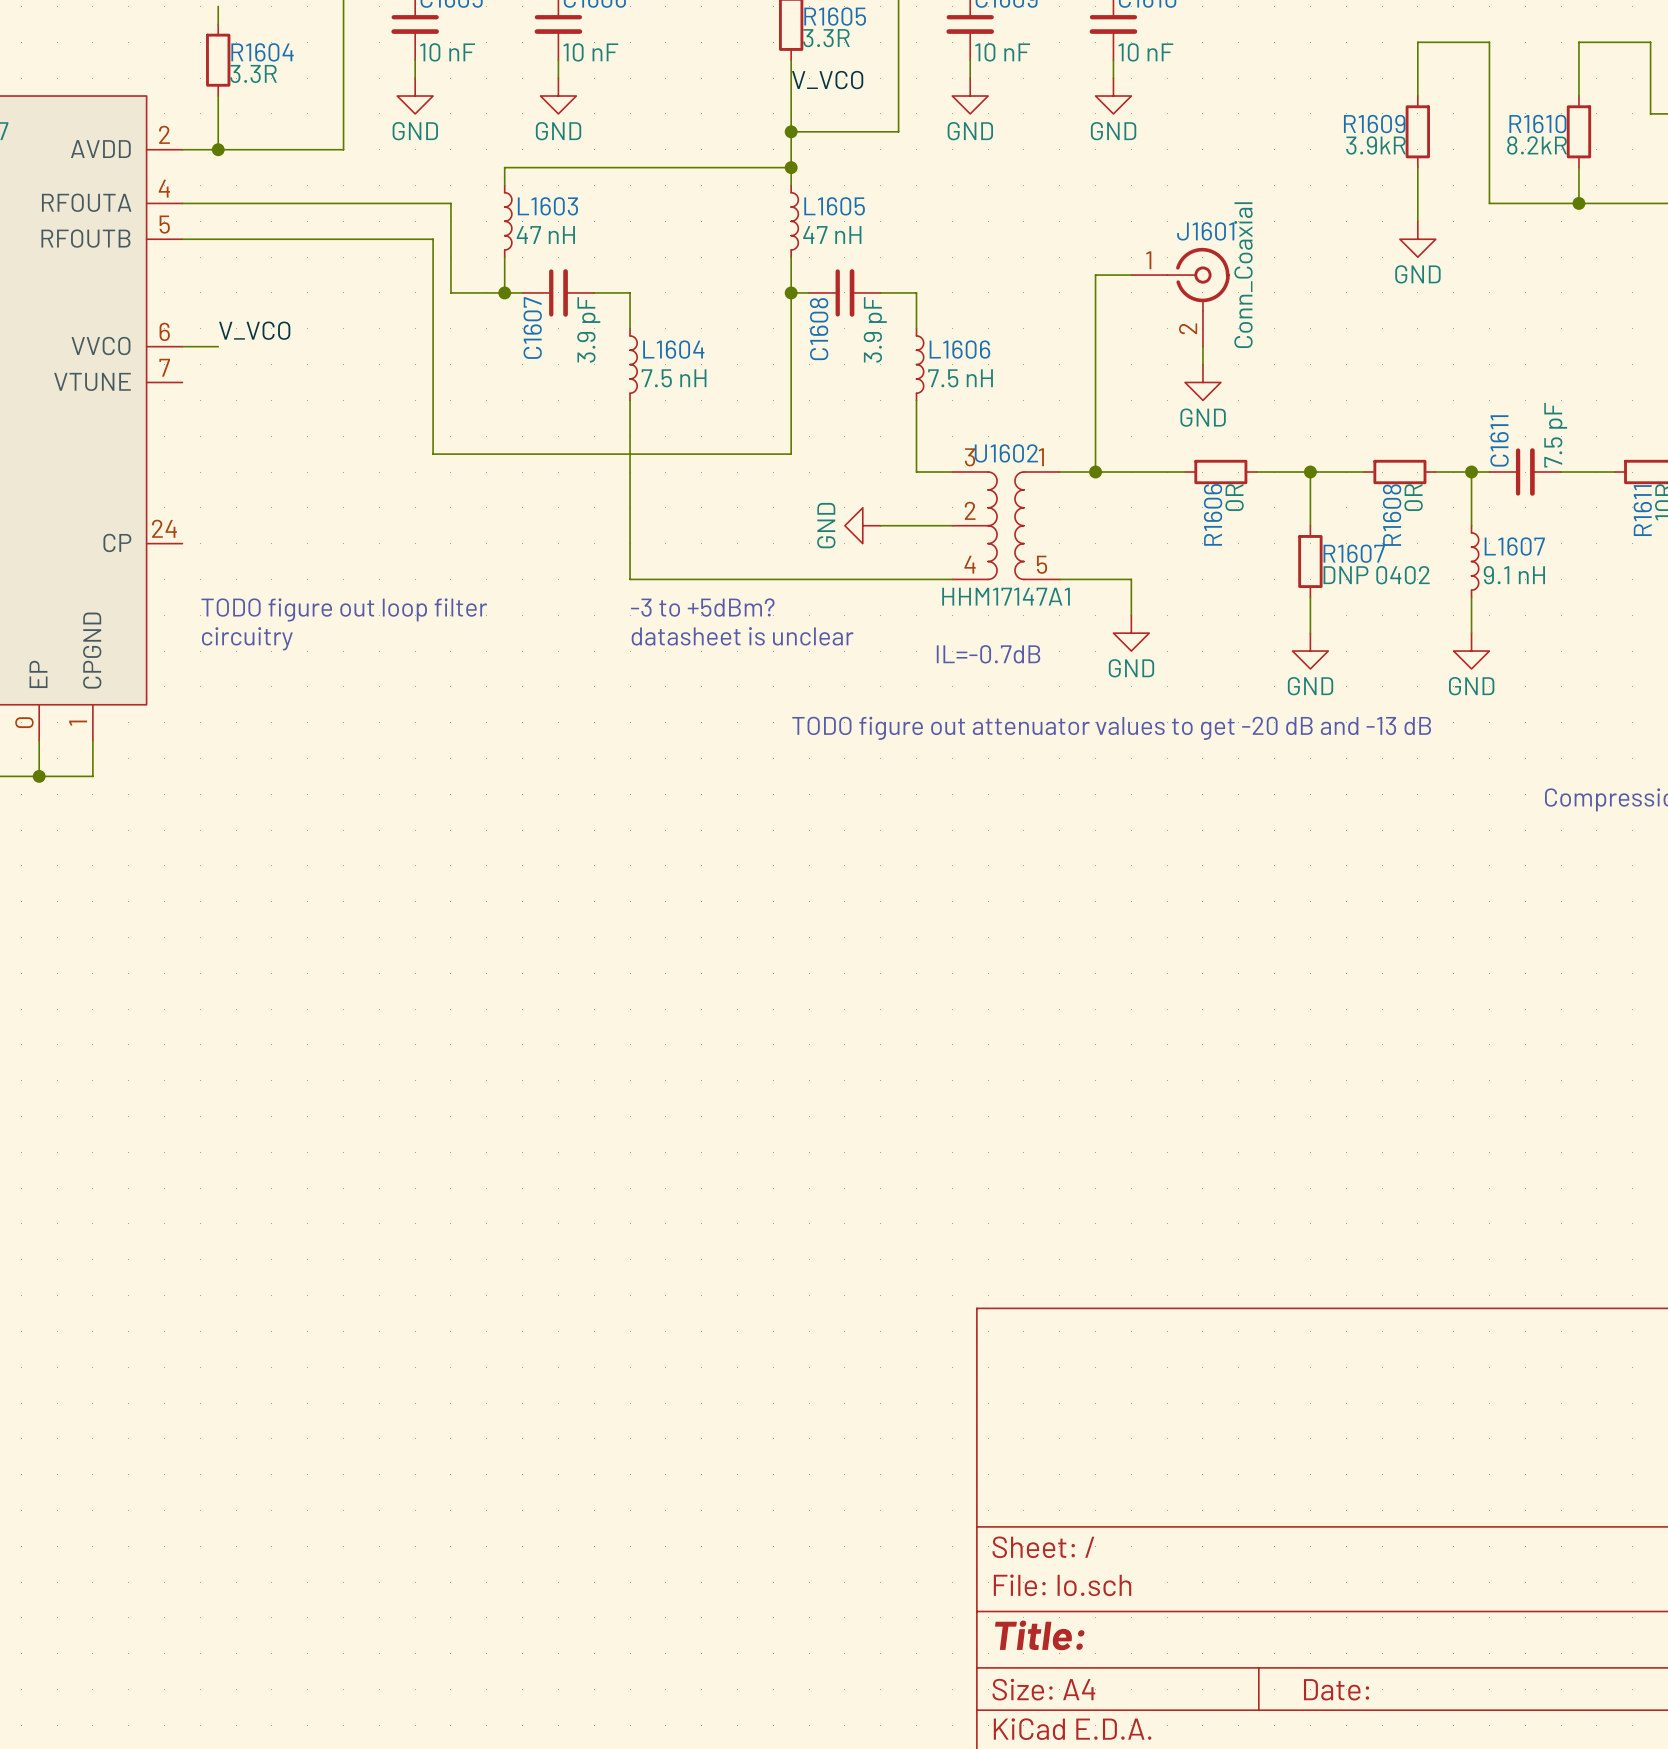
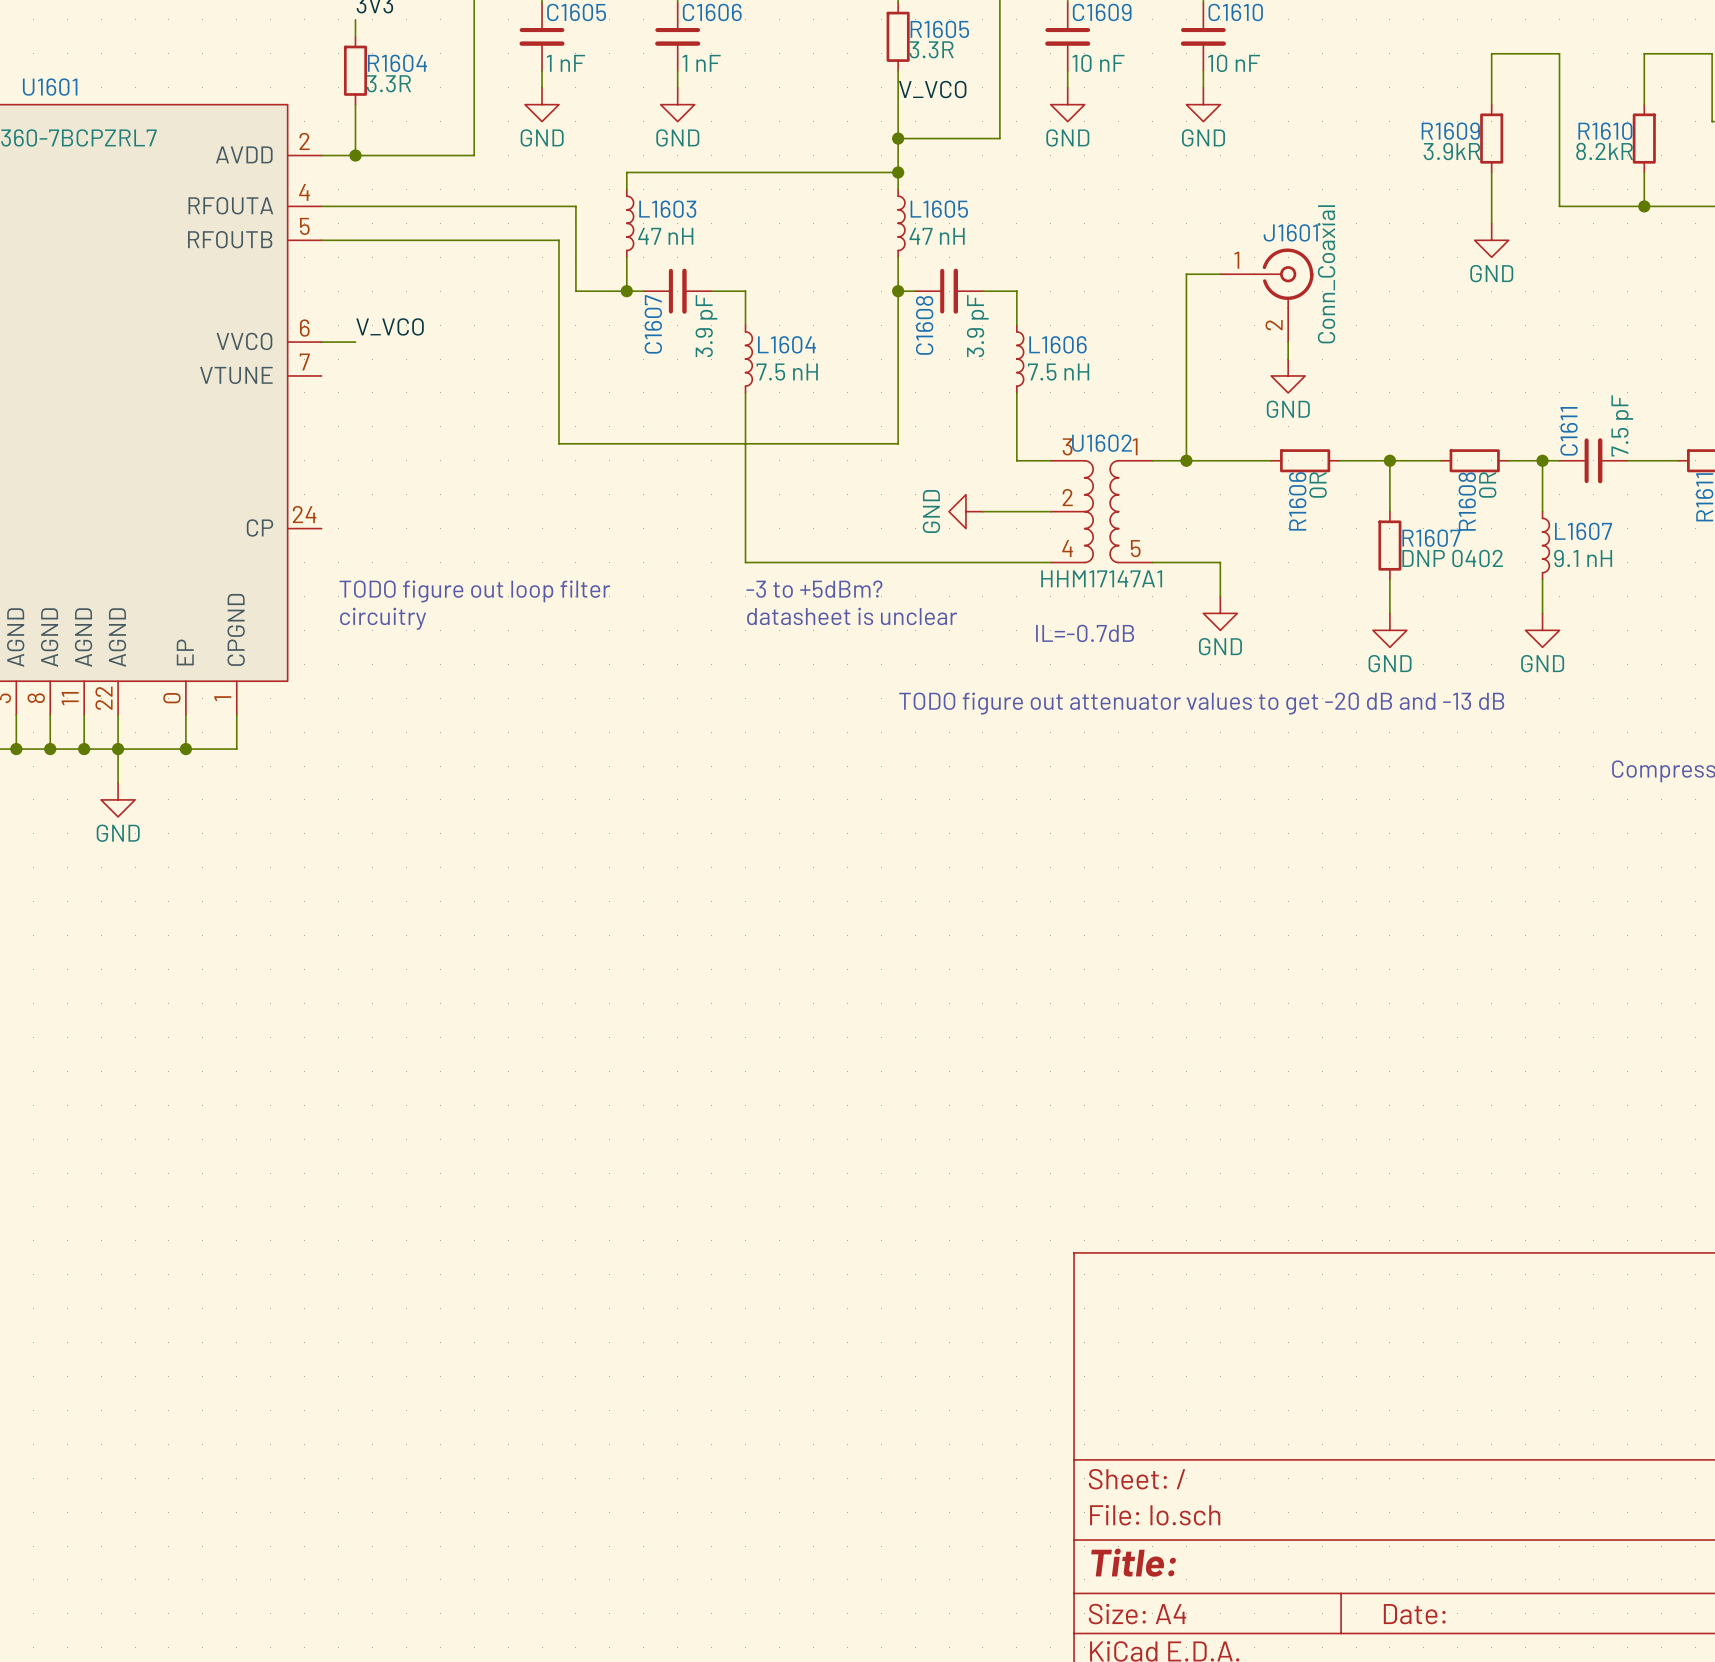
C1605 value: 10 nF (447, 52) -> 1 nF (565, 63)
C1606 value: 10 nF (590, 52) -> 1 nF (701, 63)

